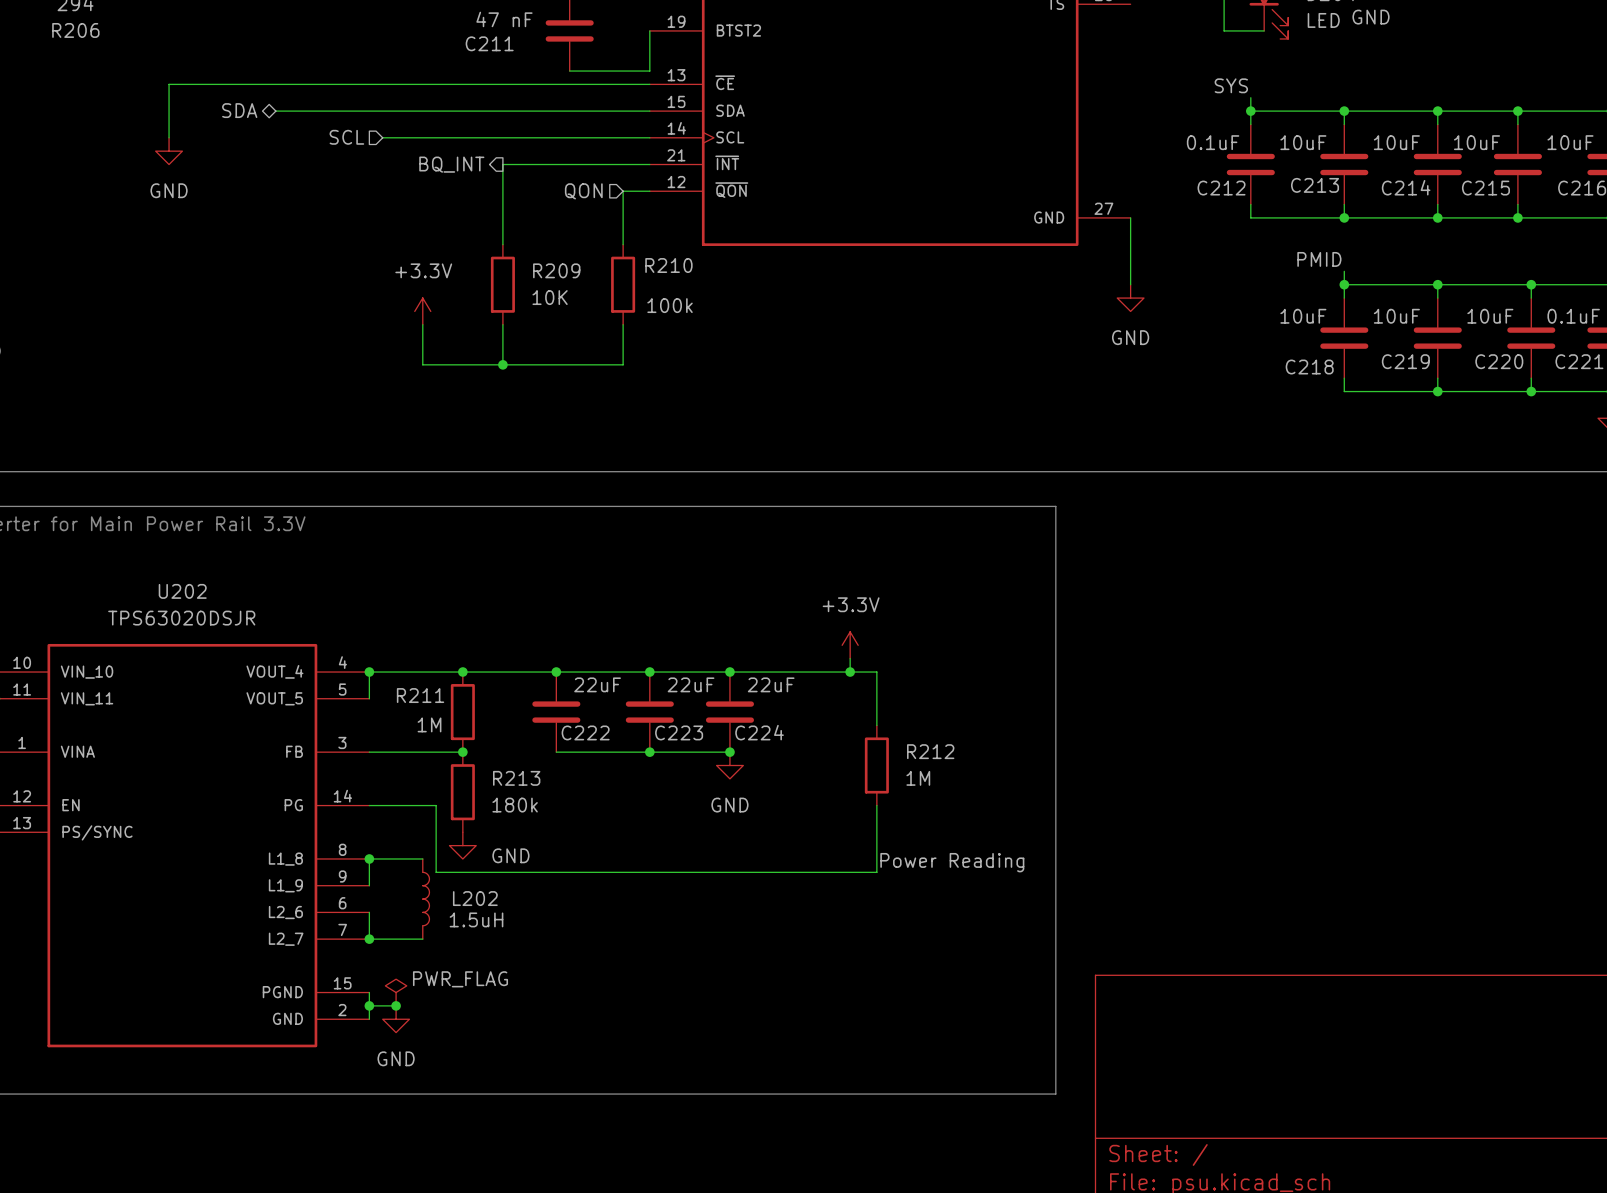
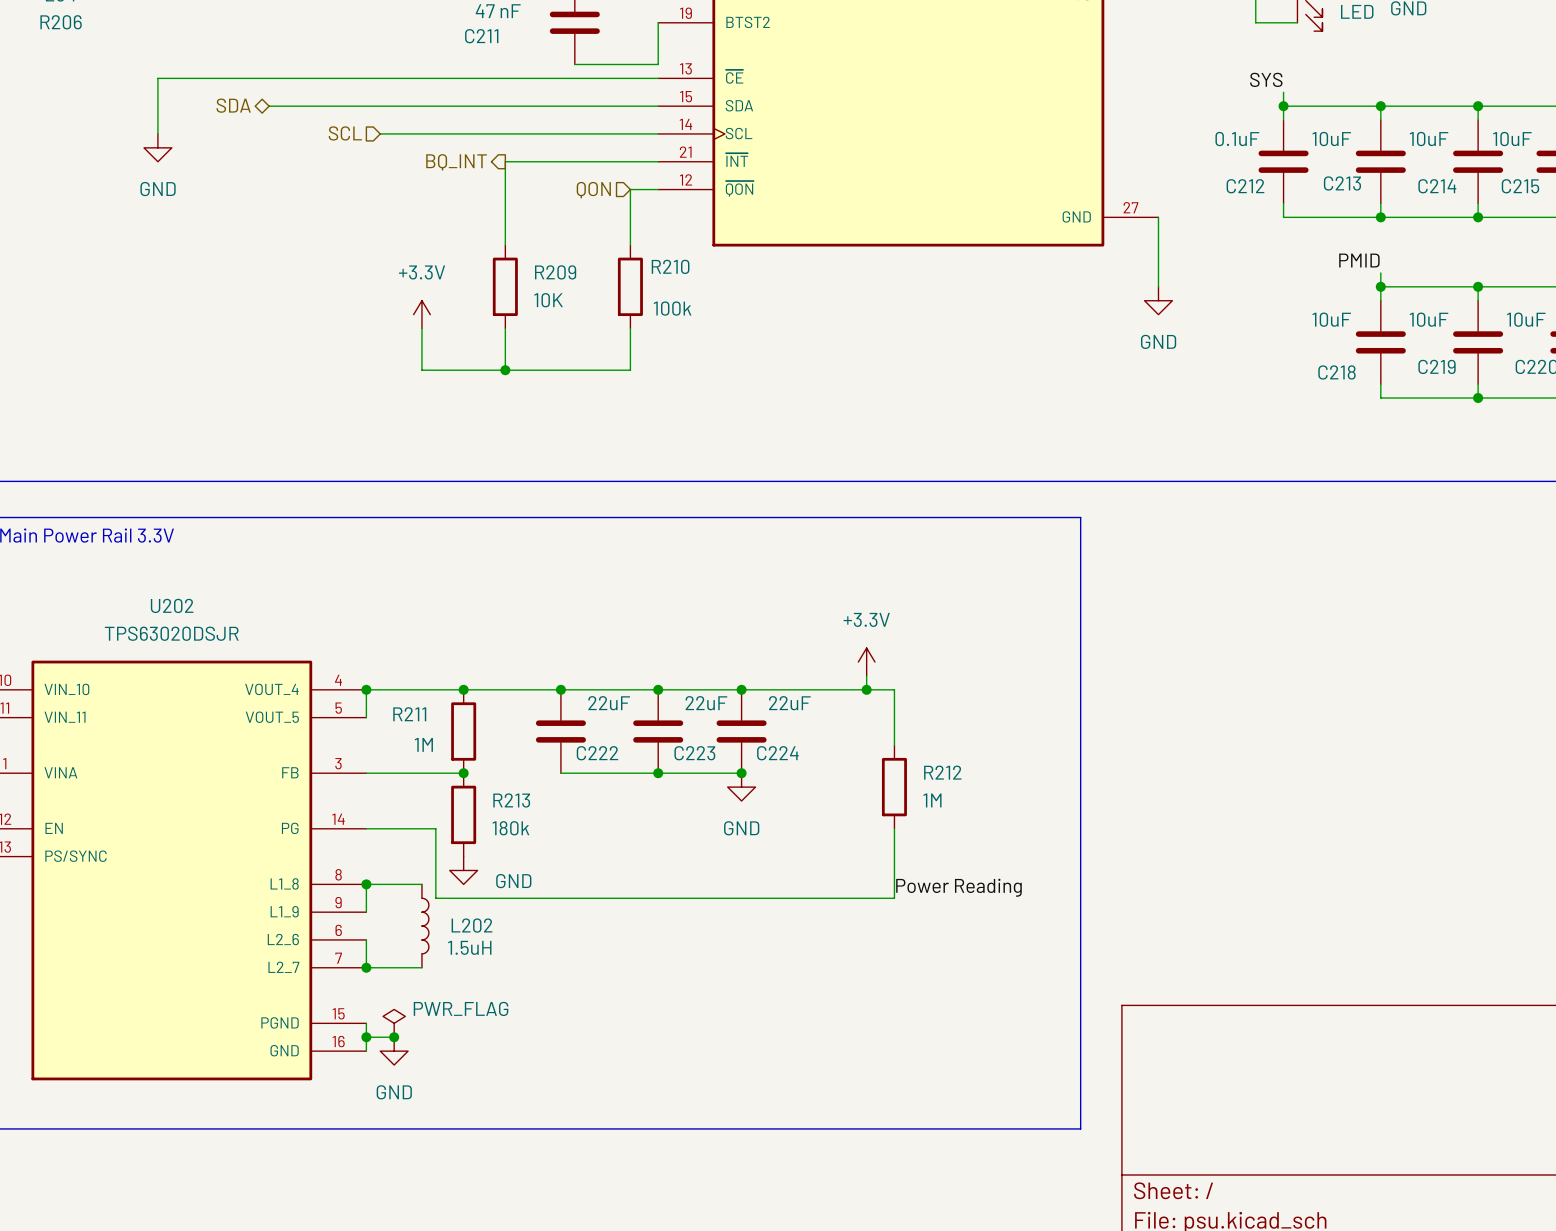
U202 pin number: 2 (342, 1010) -> 16 (338, 1041)

